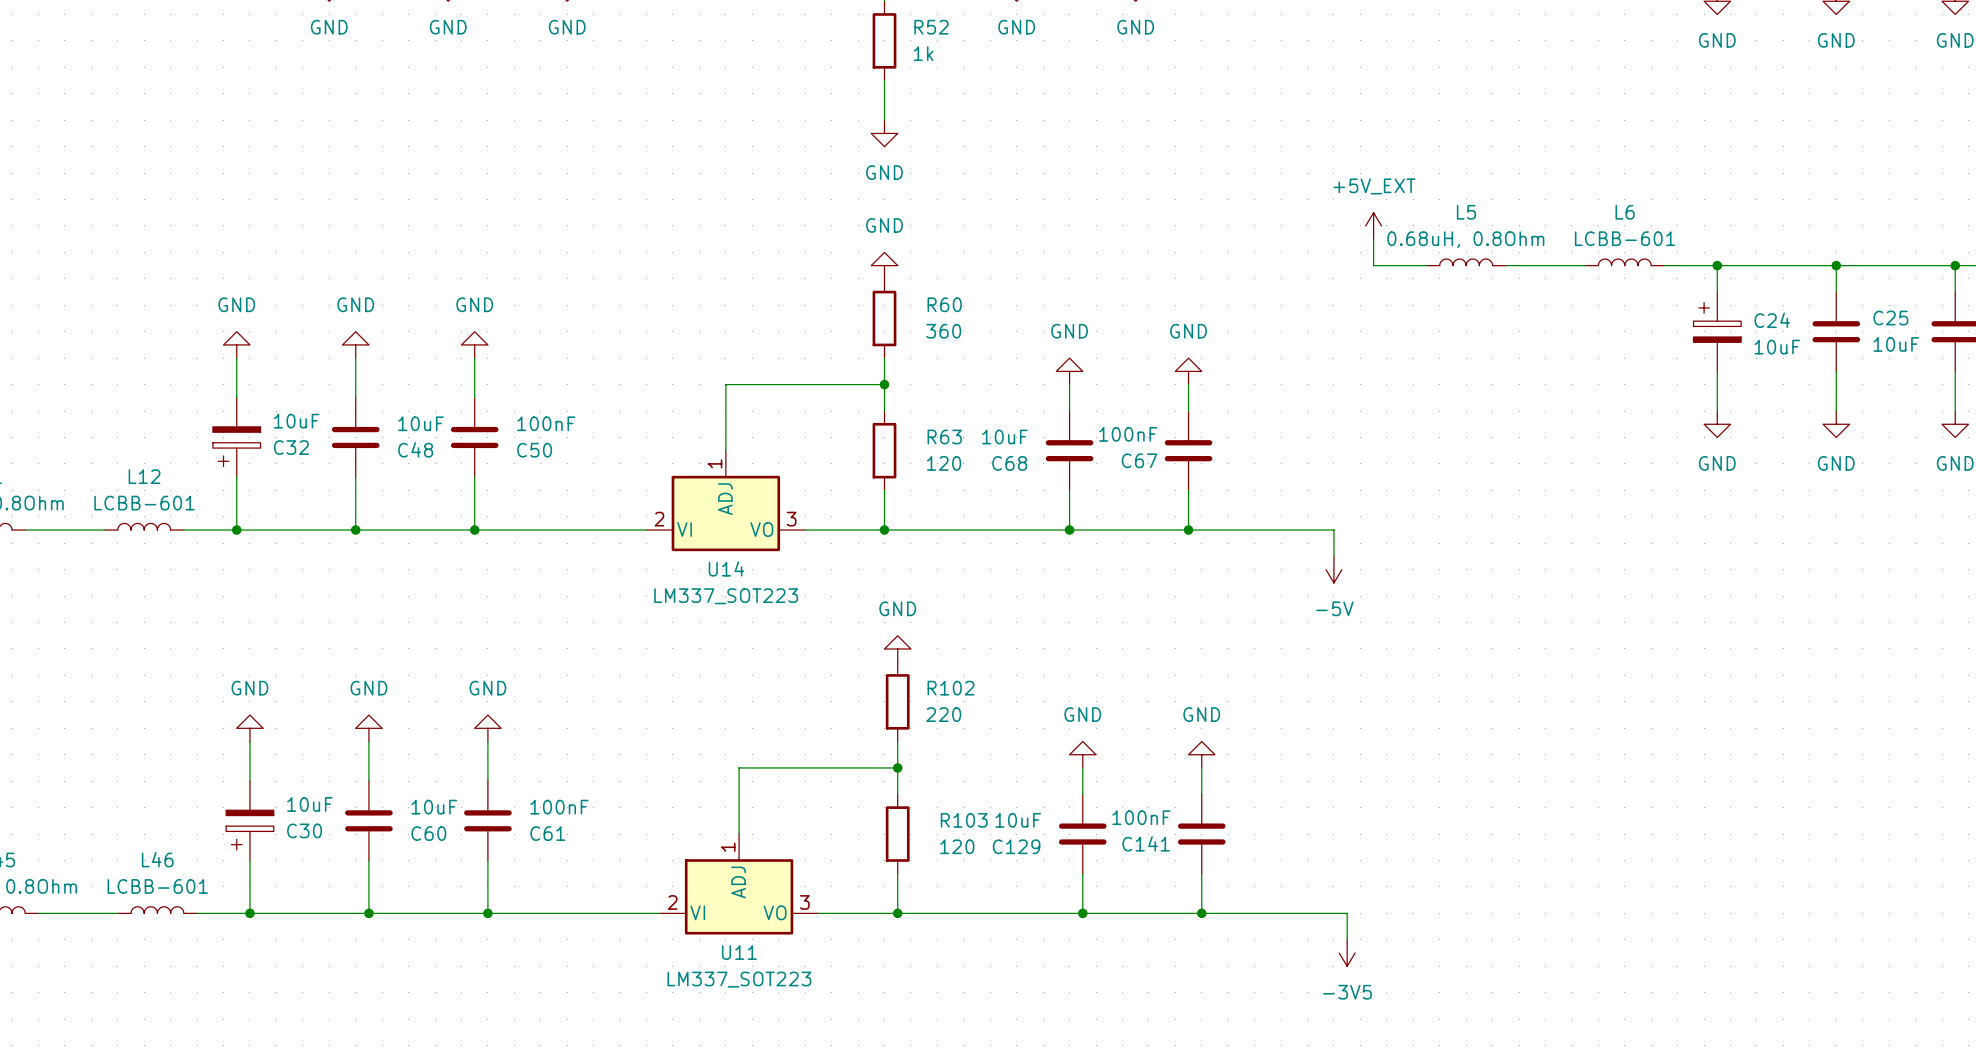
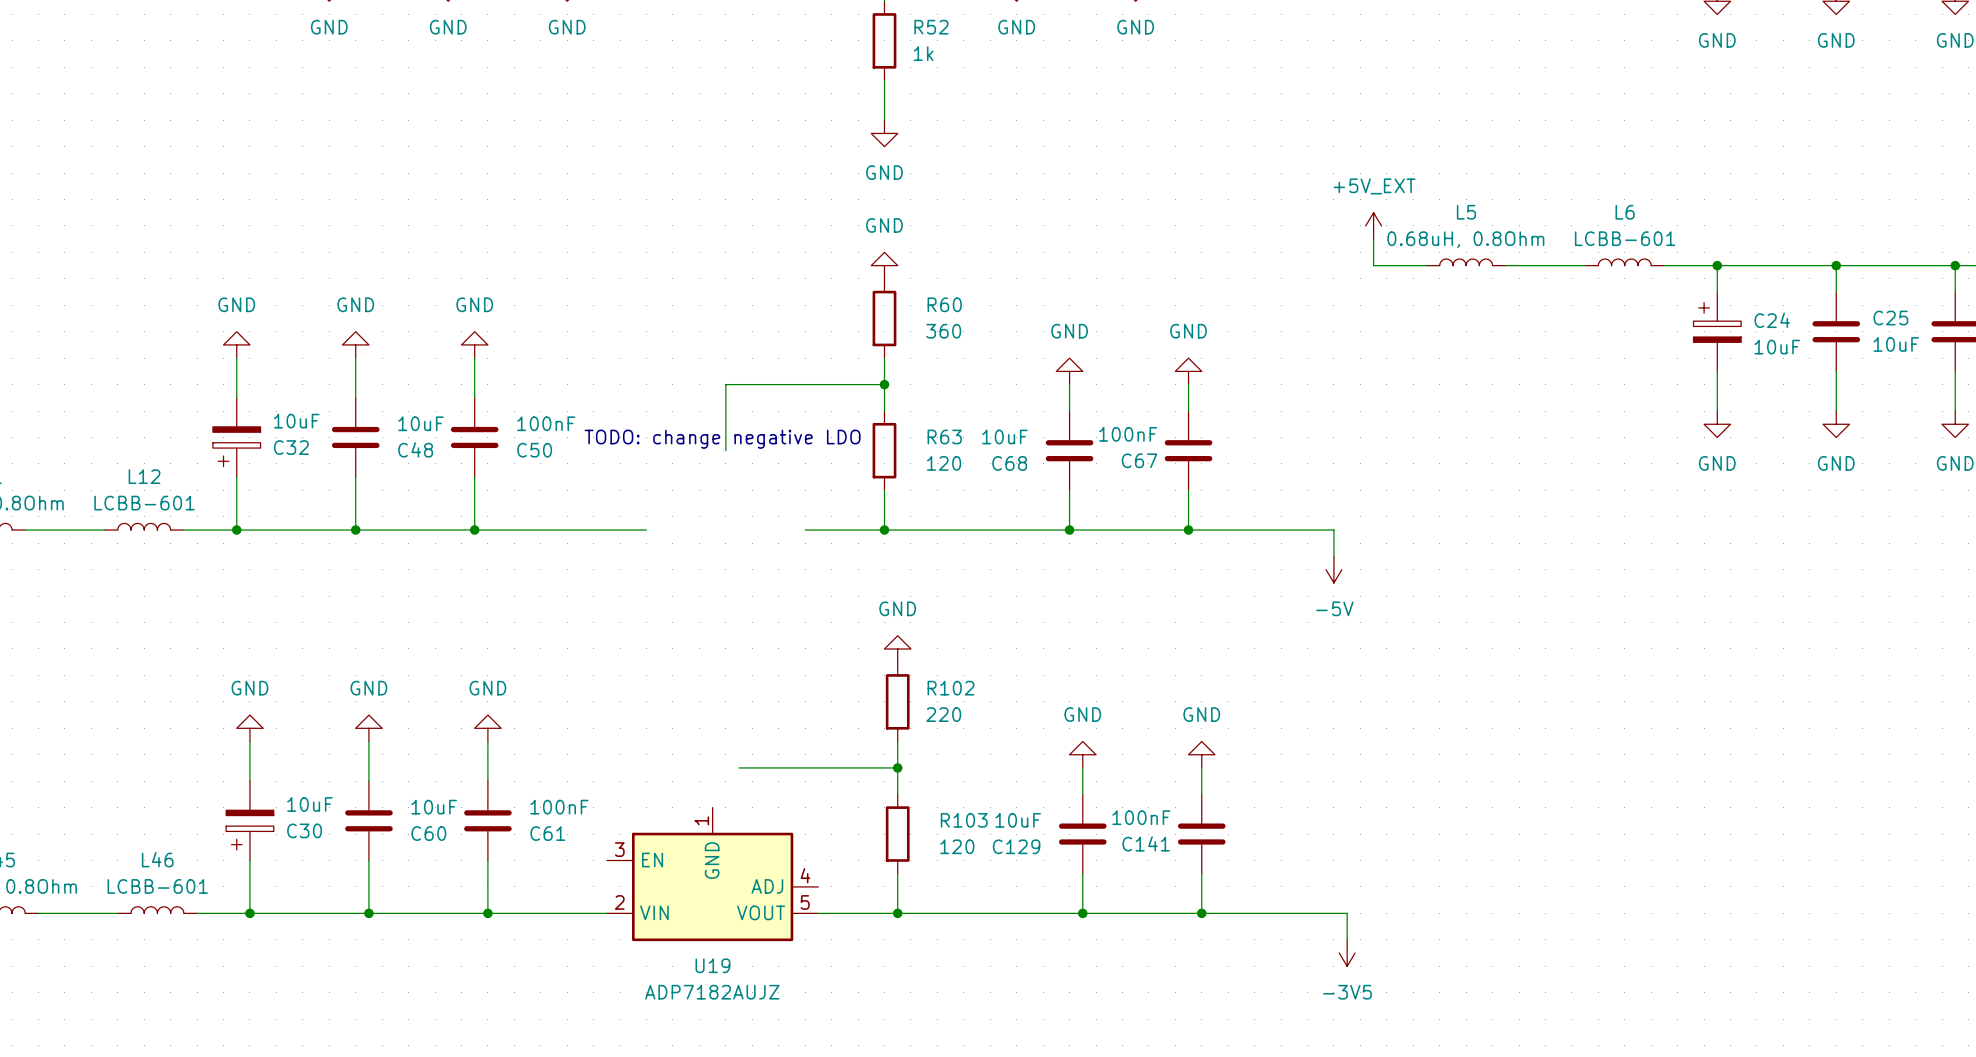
text: none -> TODO: change negative LDO (722, 439)
U14: LM337_SOT223 (725, 500) -> none
wire: (739, 767) (739, 834) -> none
U19: none -> ADP7182AUJZ (712, 874)
U11: LM337_SOT223 (739, 884) -> none

